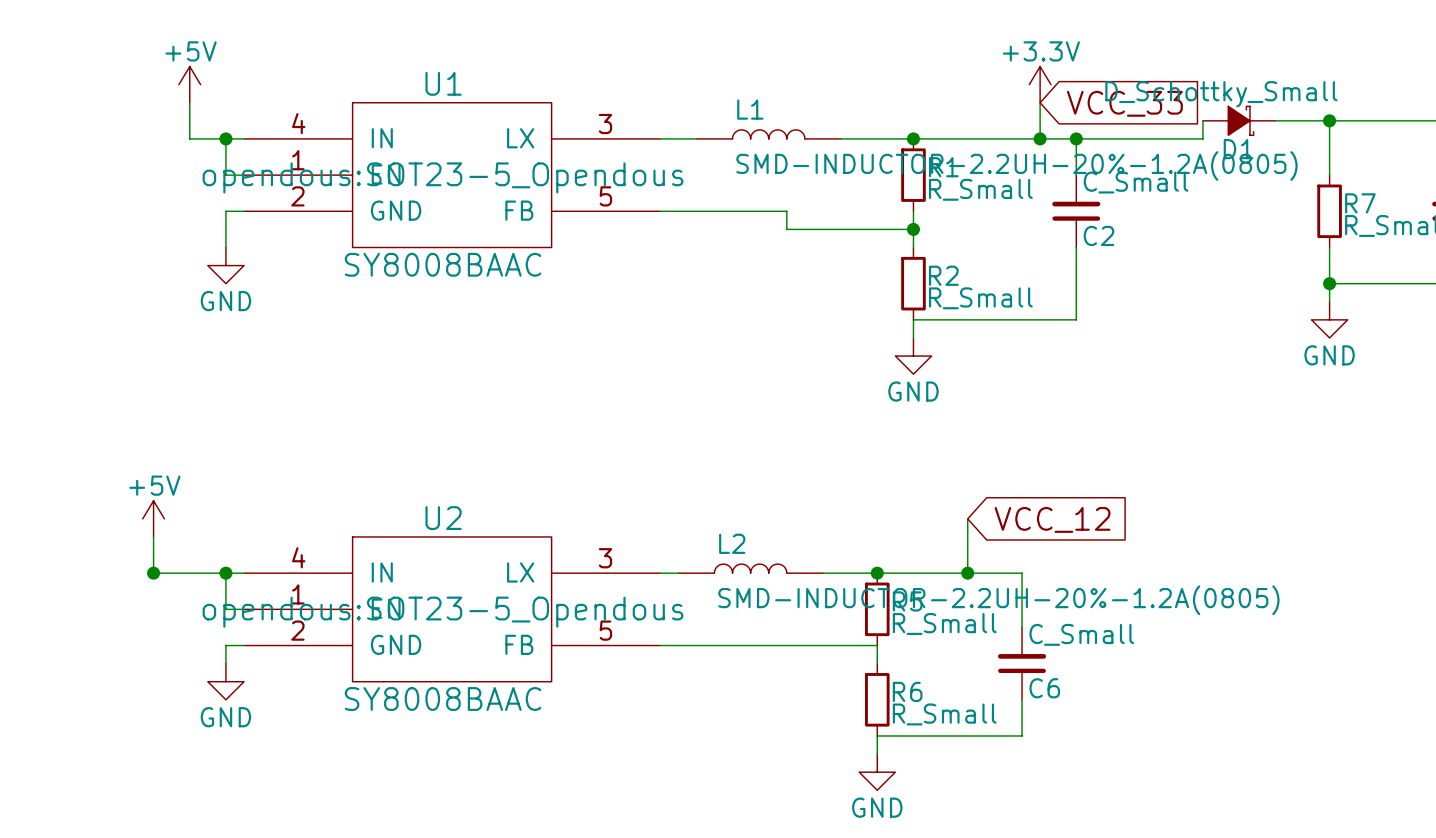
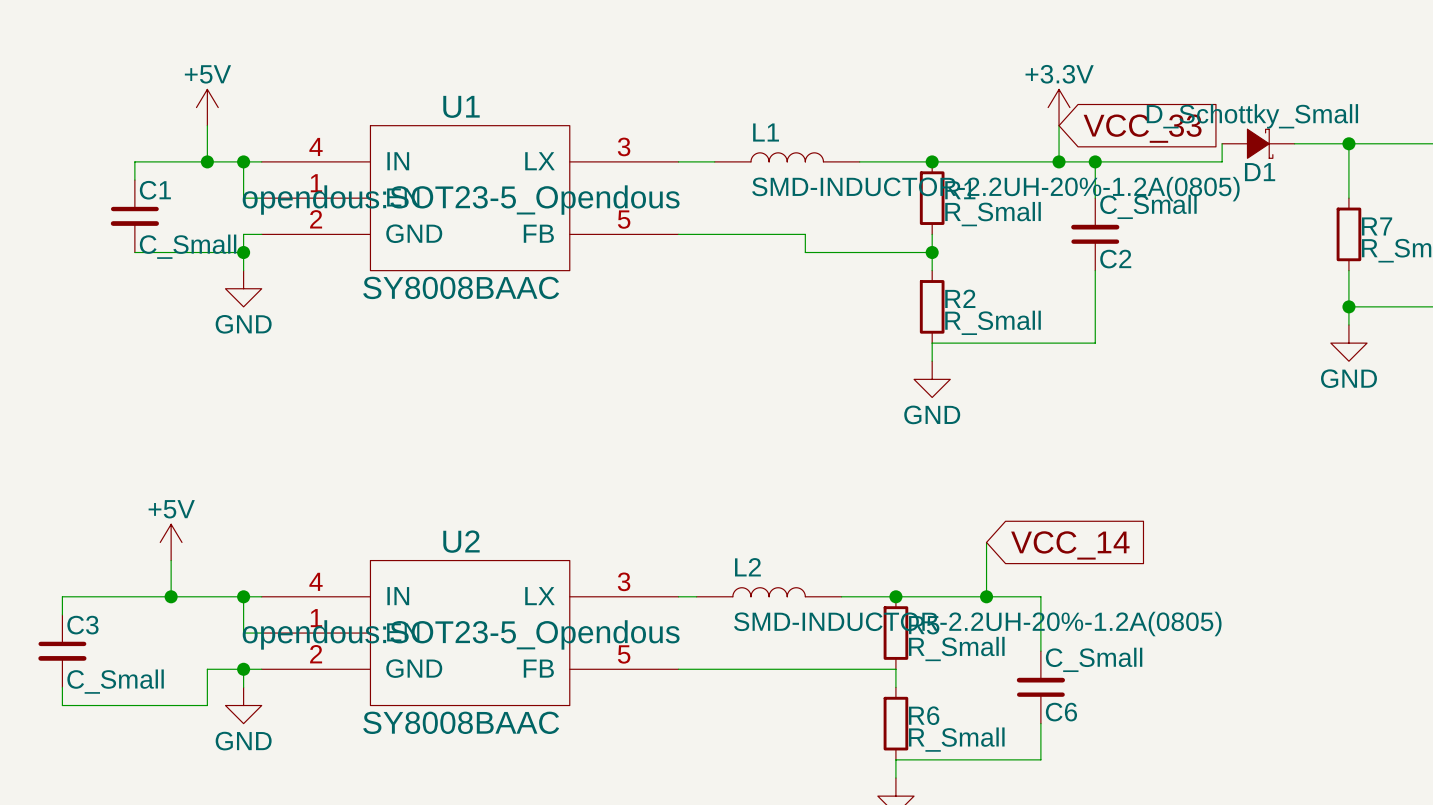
wire: none -> (207, 161) (134, 161) (134, 180)
junction: none -> (207, 161)
C1: none -> C_Small (134, 216)
wire: none -> (134, 252) (243, 252)
junction: none -> (243, 252)
global label: VCC_12 (1052, 519) -> VCC_14 (1070, 545)
wire: none -> (171, 596) (62, 596) (62, 614)
C3: none -> C_Small (62, 651)
wire: none -> (243, 669) (207, 669) (207, 705) (62, 705) (62, 687)
junction: none -> (243, 669)

